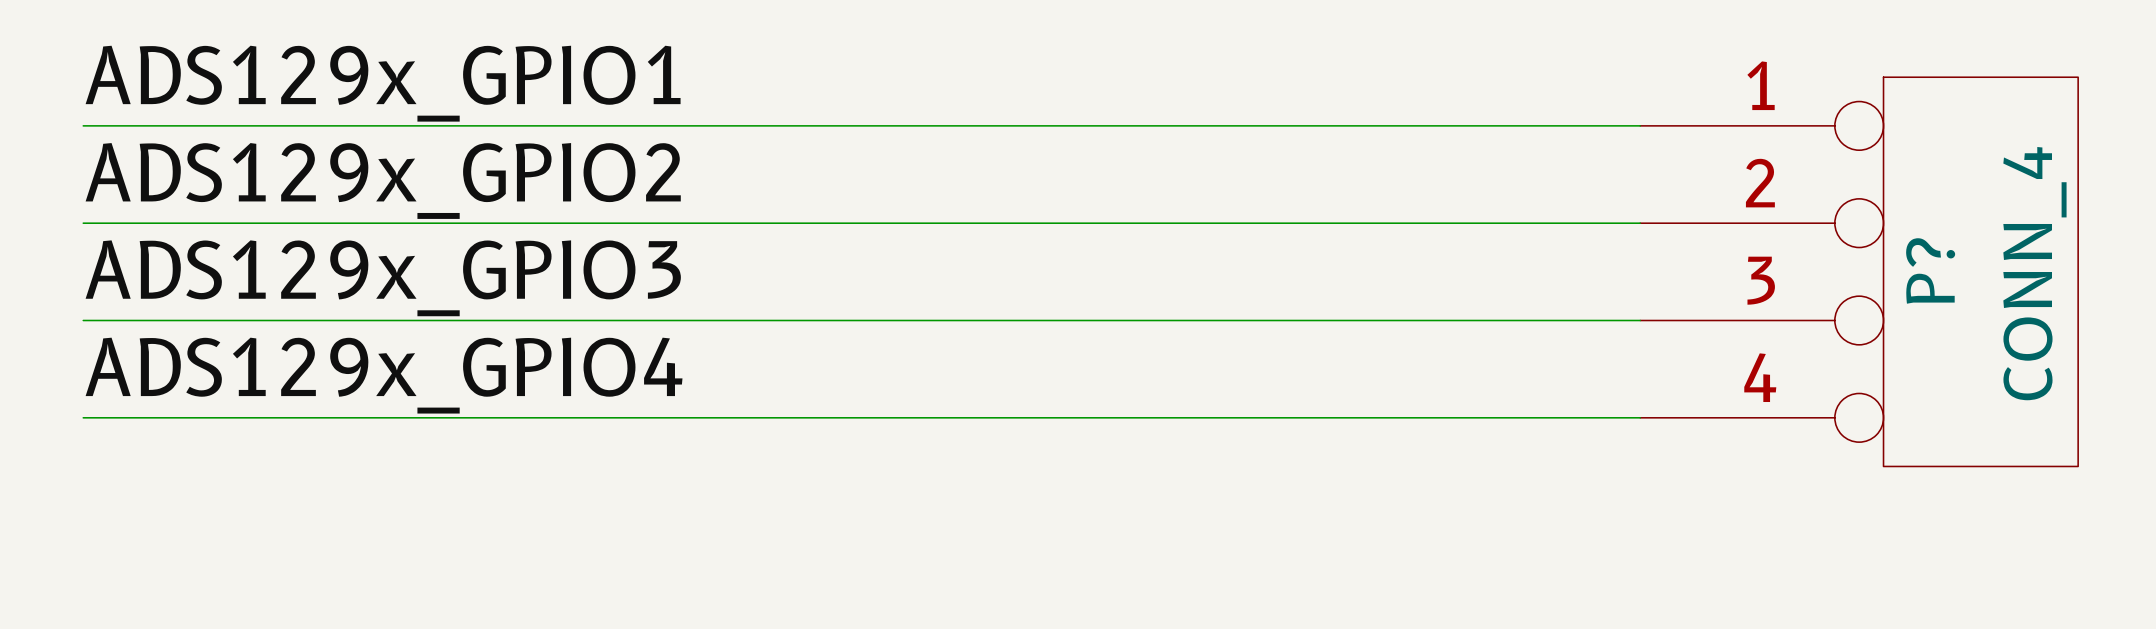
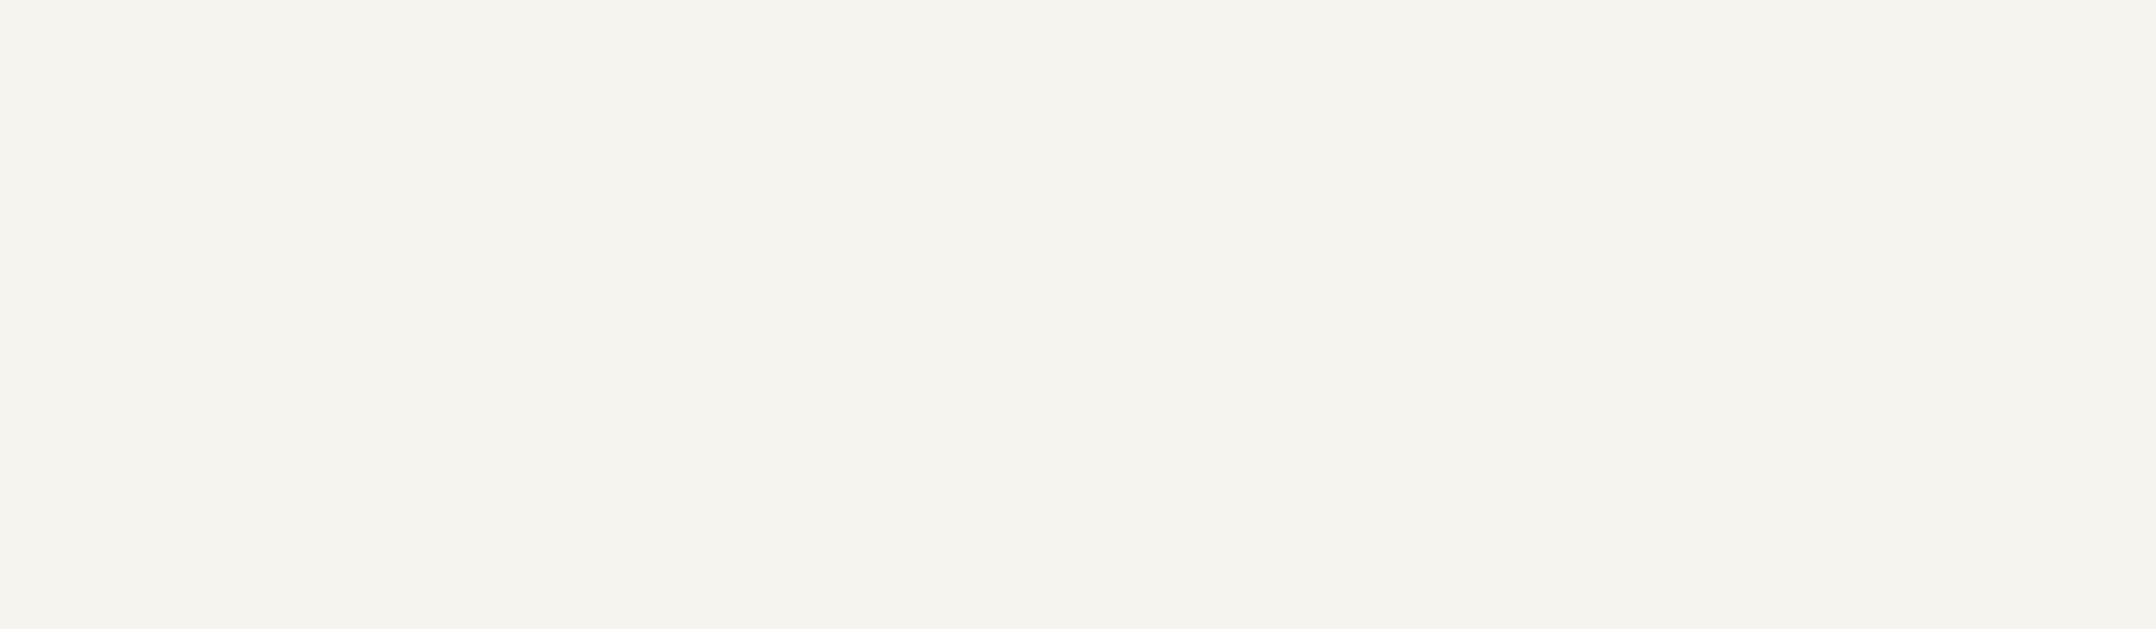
label: ADS129x_GPIO1 (383, 83) -> none
wire: (83, 125) (1640, 125) -> none
label: ADS129x_GPIO2 (383, 180) -> none
wire: (83, 223) (1640, 223) -> none
P?: CONN_4 (1859, 271) -> none
label: ADS129x_GPIO3 (383, 278) -> none
wire: (83, 320) (1640, 320) -> none
label: ADS129x_GPIO4 (384, 375) -> none
wire: (83, 417) (1640, 417) -> none

